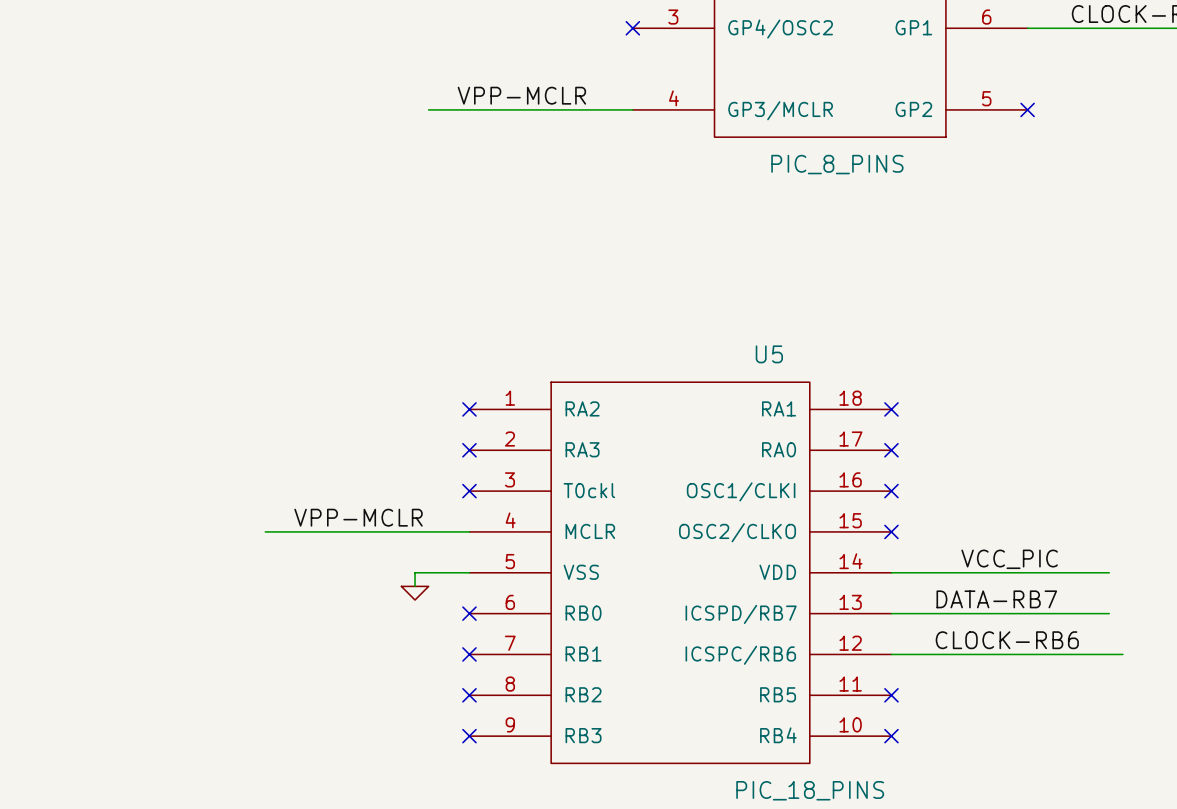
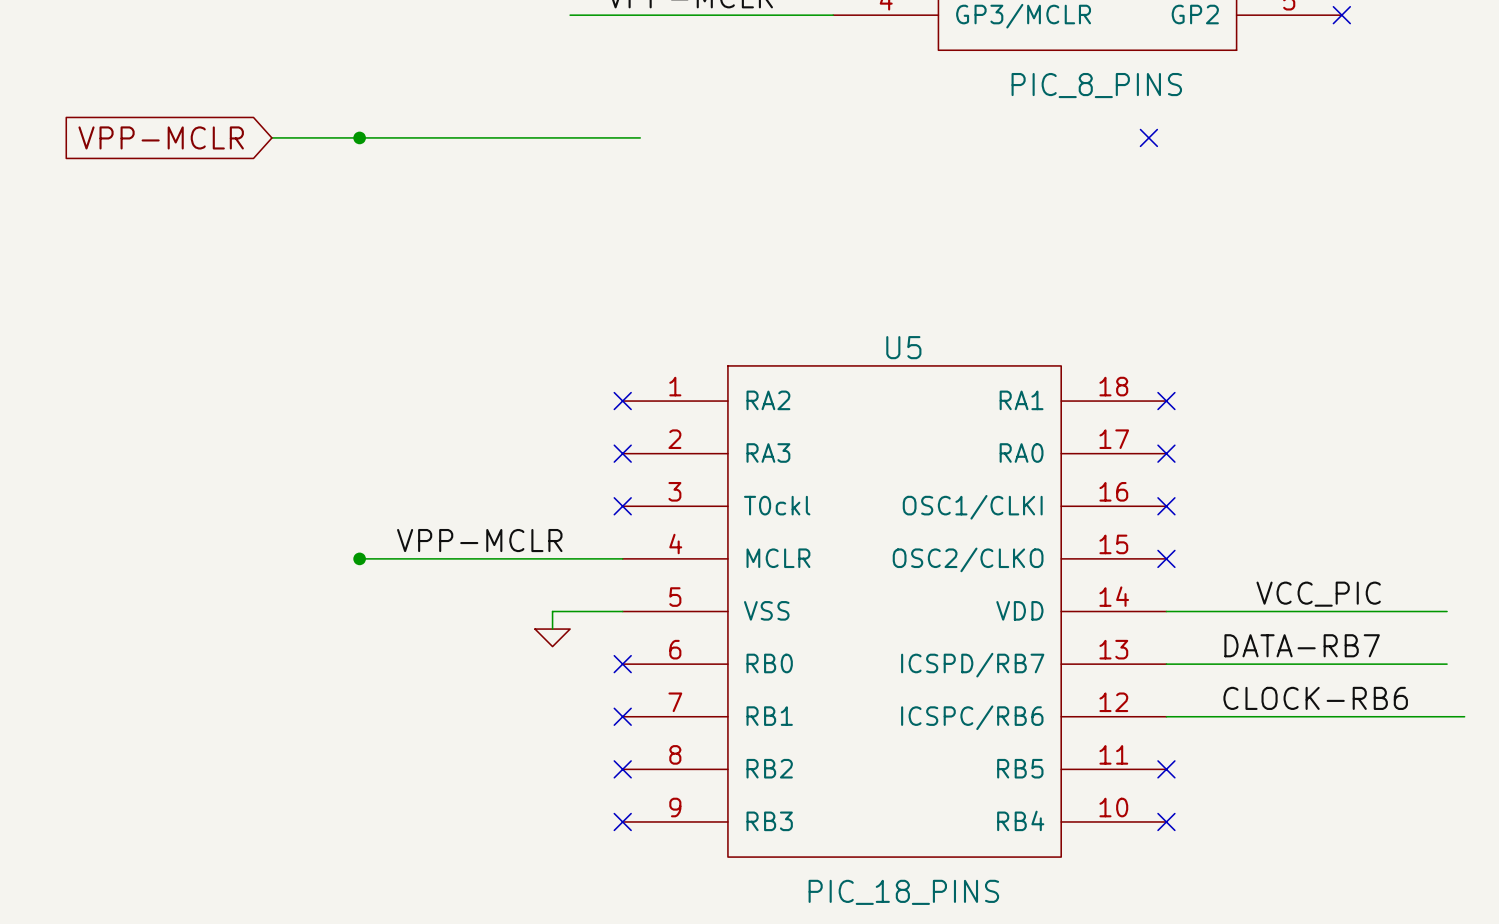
global label: none -> VPP-MCLR (161, 137)
wire: none -> (271, 137) (640, 137)
junction: none -> (359, 137)
no-connect mark: none -> (1148, 137)
U5 name position: U5 (769, 354) -> U5 (903, 347)
junction: none -> (359, 558)
U5 value position: PIC_18_PINS (810, 790) -> PIC_18_PINS (903, 892)

